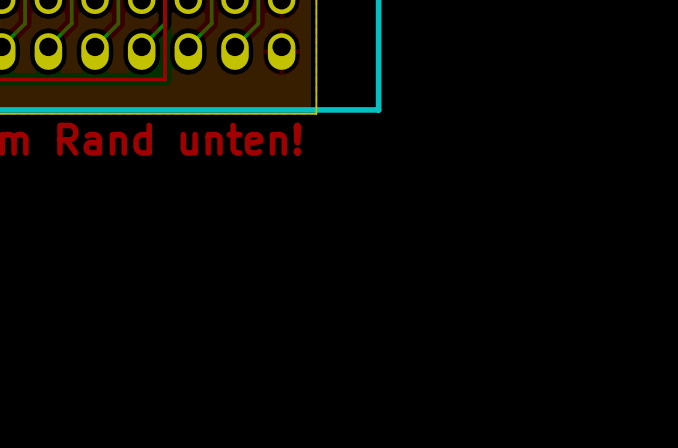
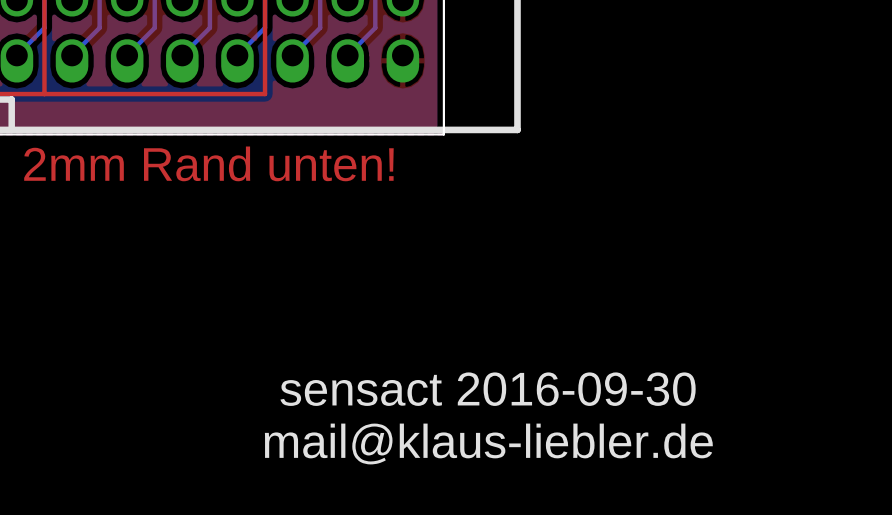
text: none -> sensact 2016-09-30 (488, 389)
text: none -> mail@klaus-liebler.de (488, 444)

